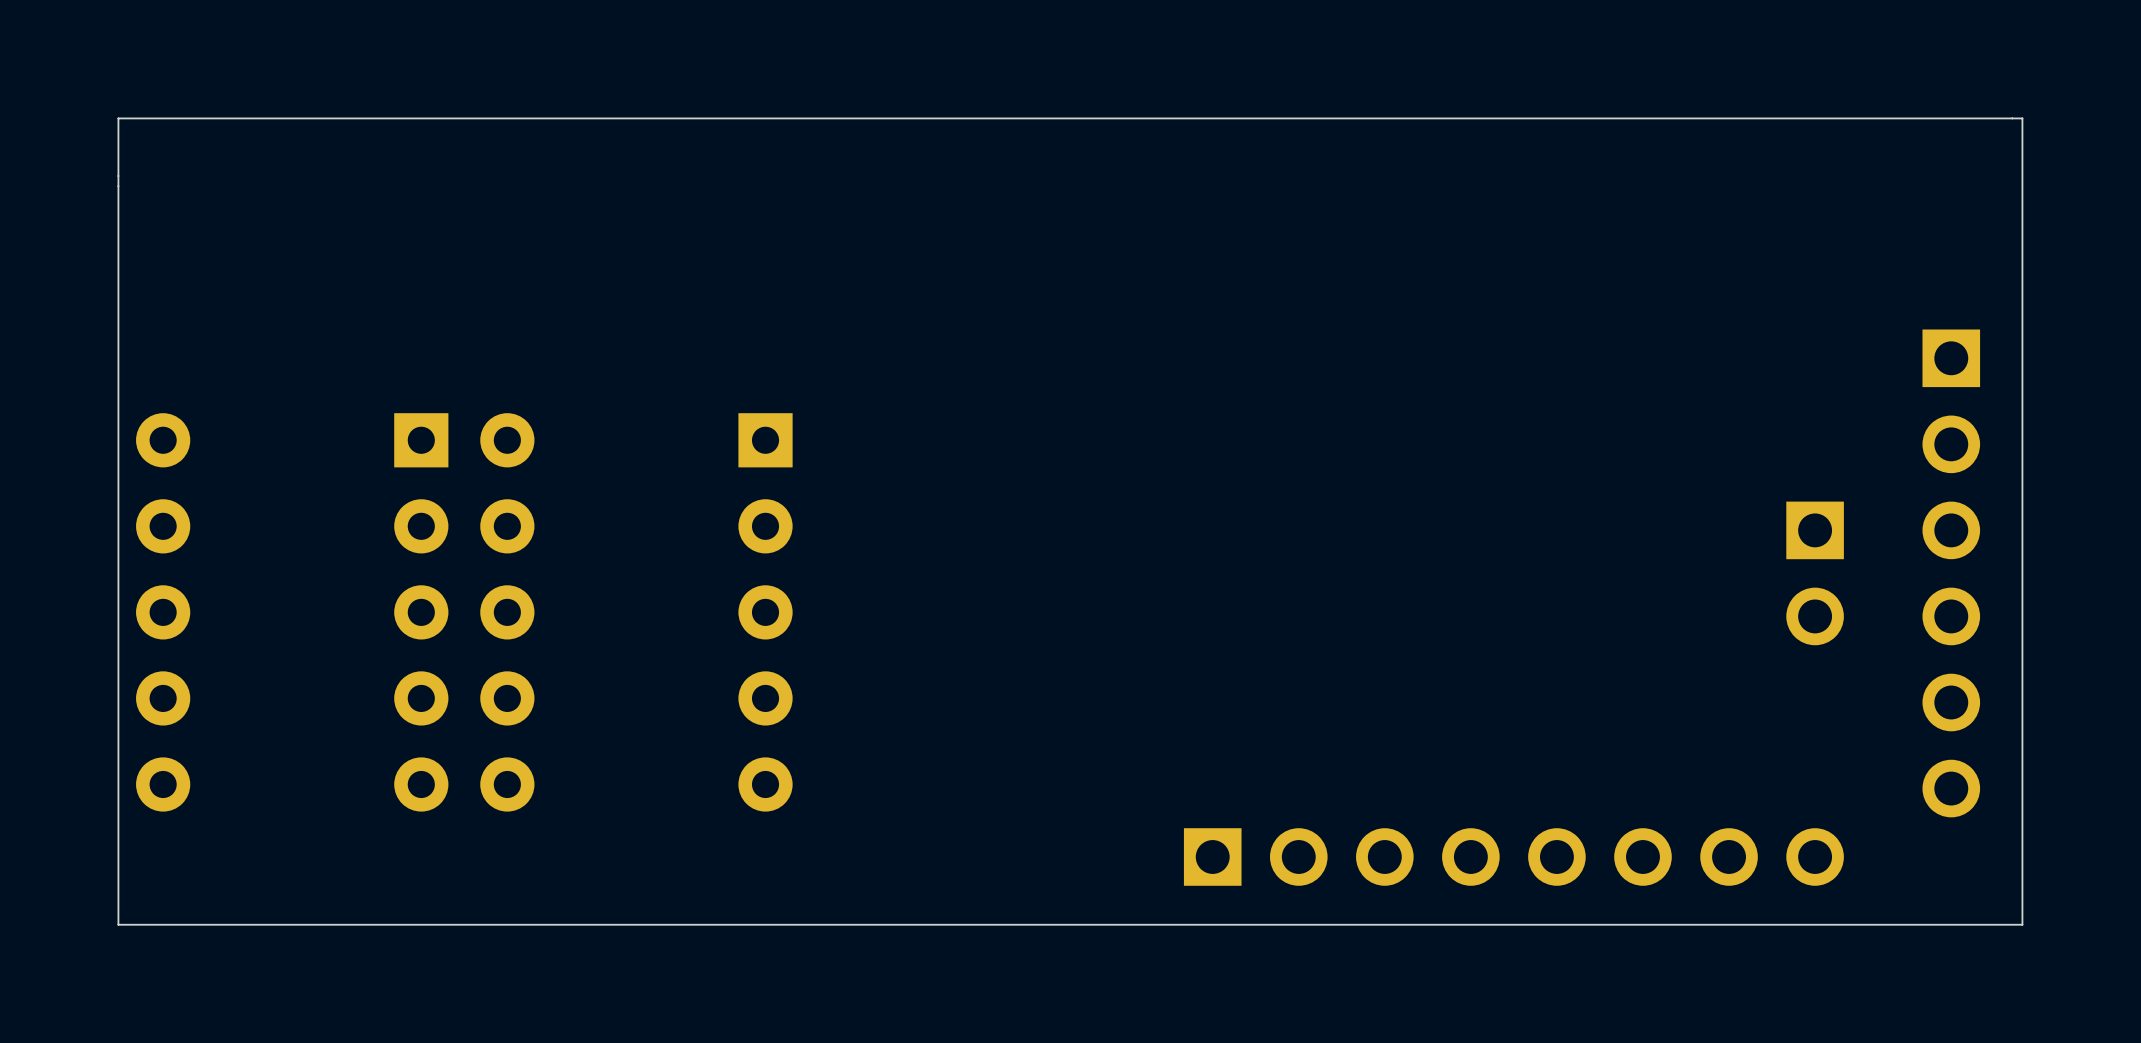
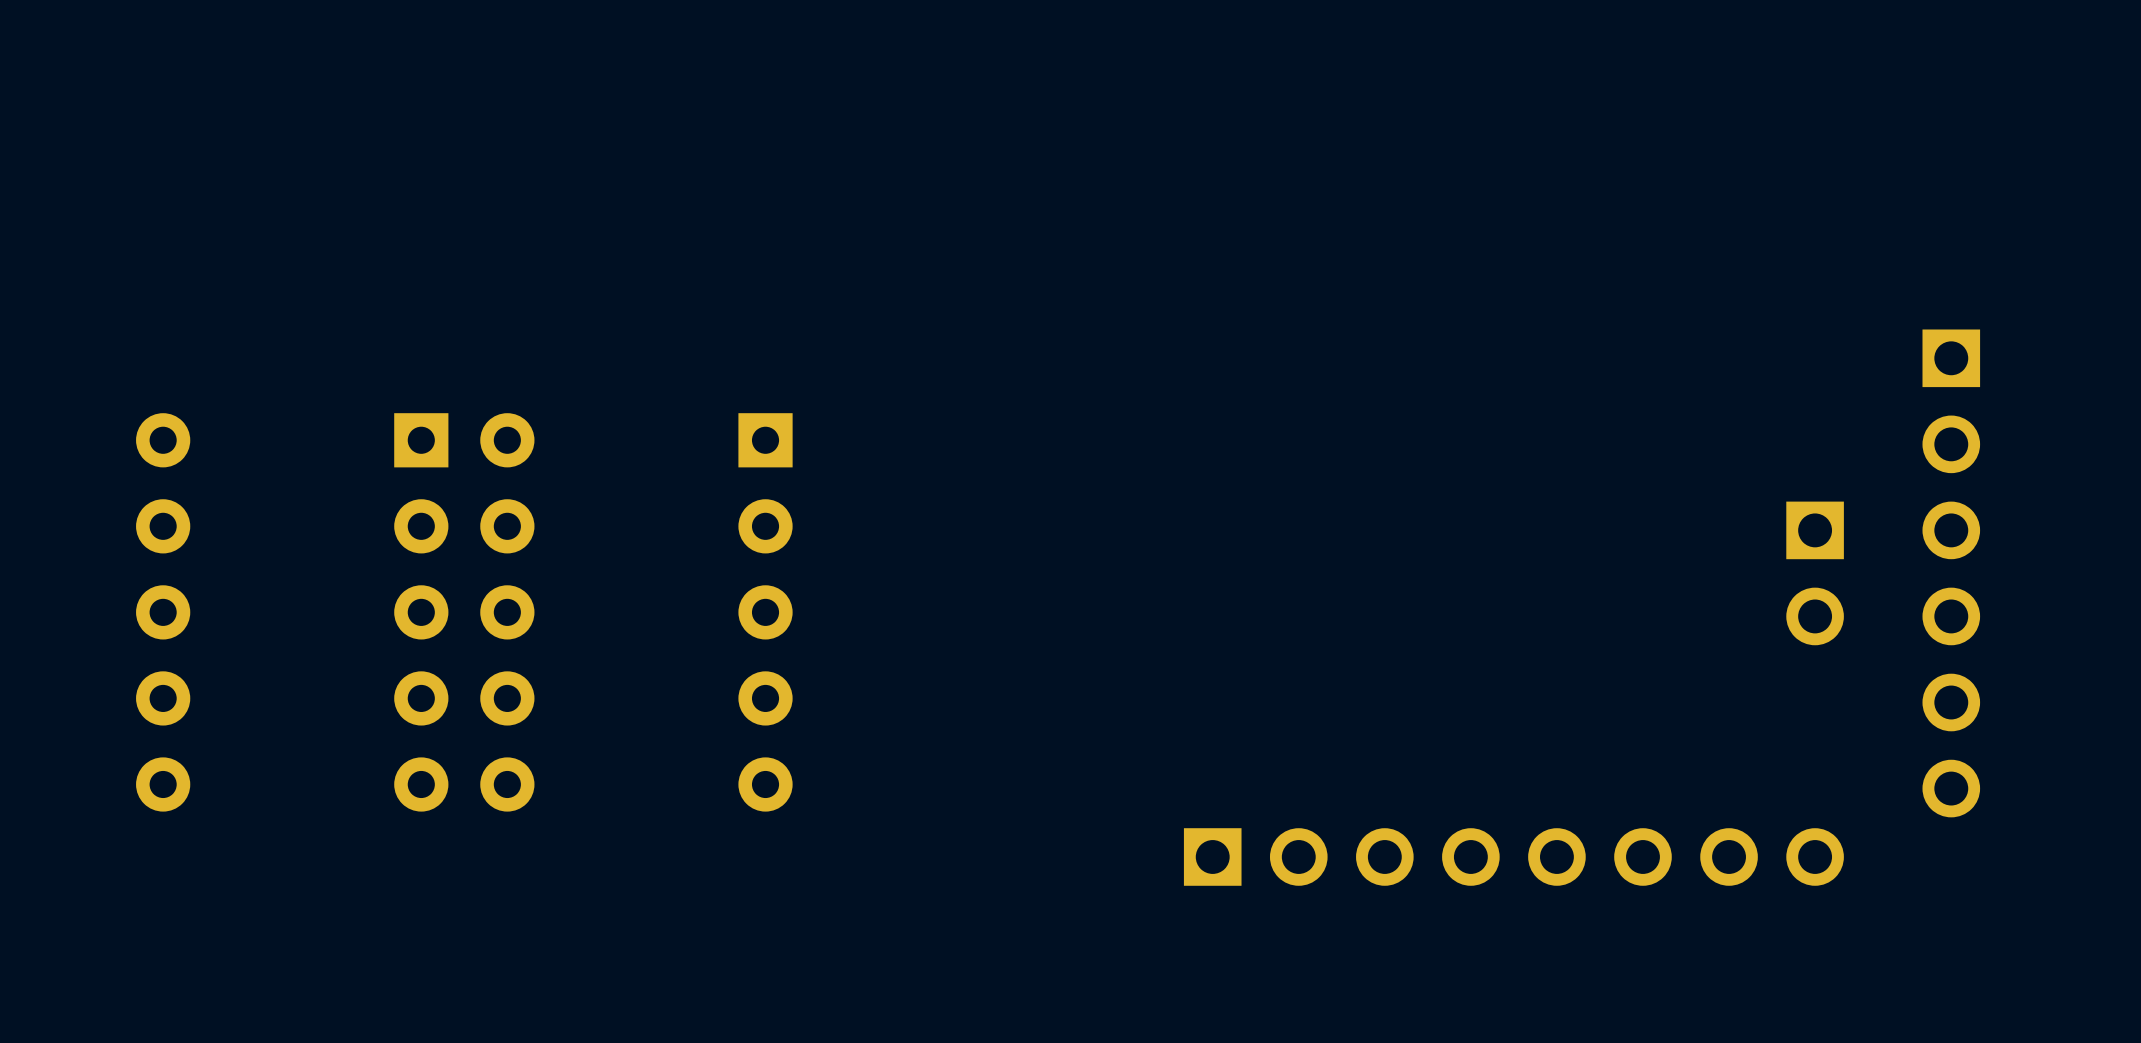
board edge: (2022, 118) (2022, 924) (118, 924) (118, 118) (2022, 118) -> none

